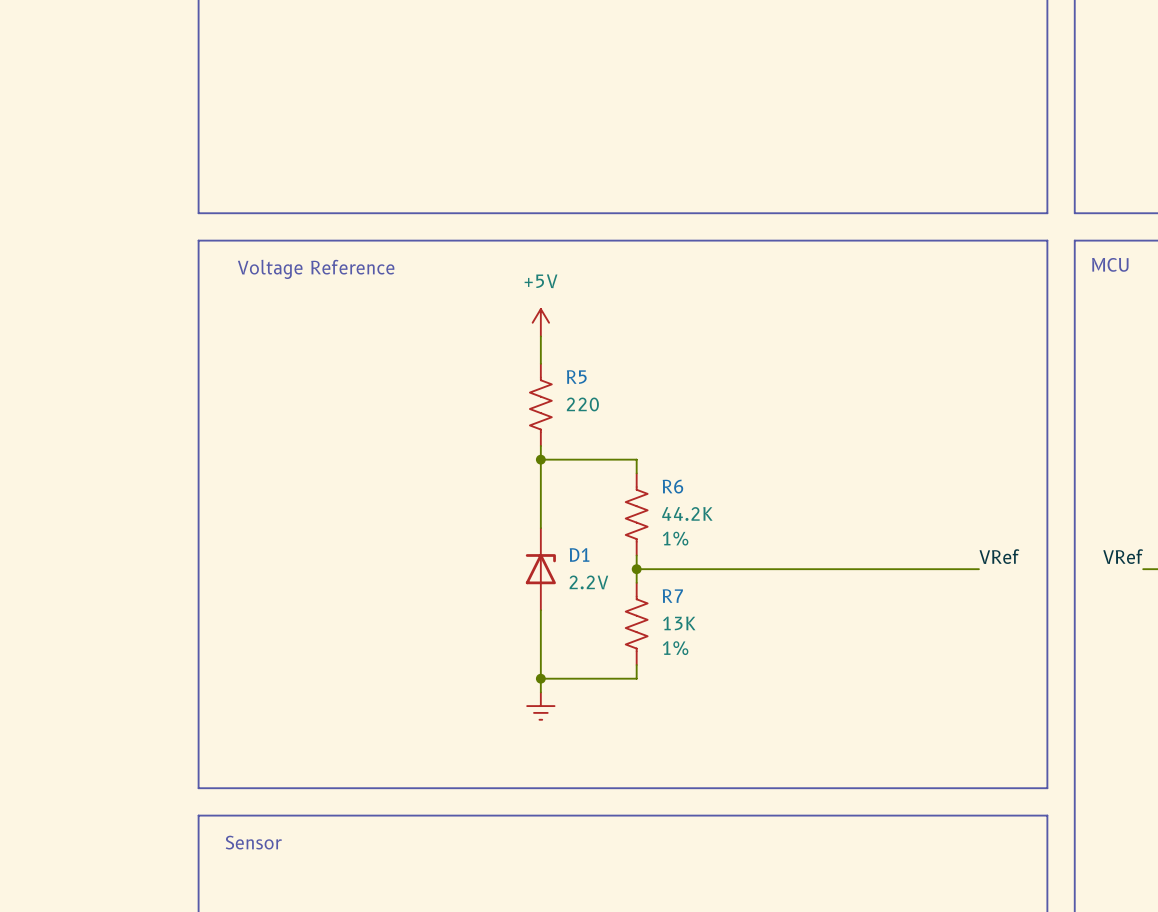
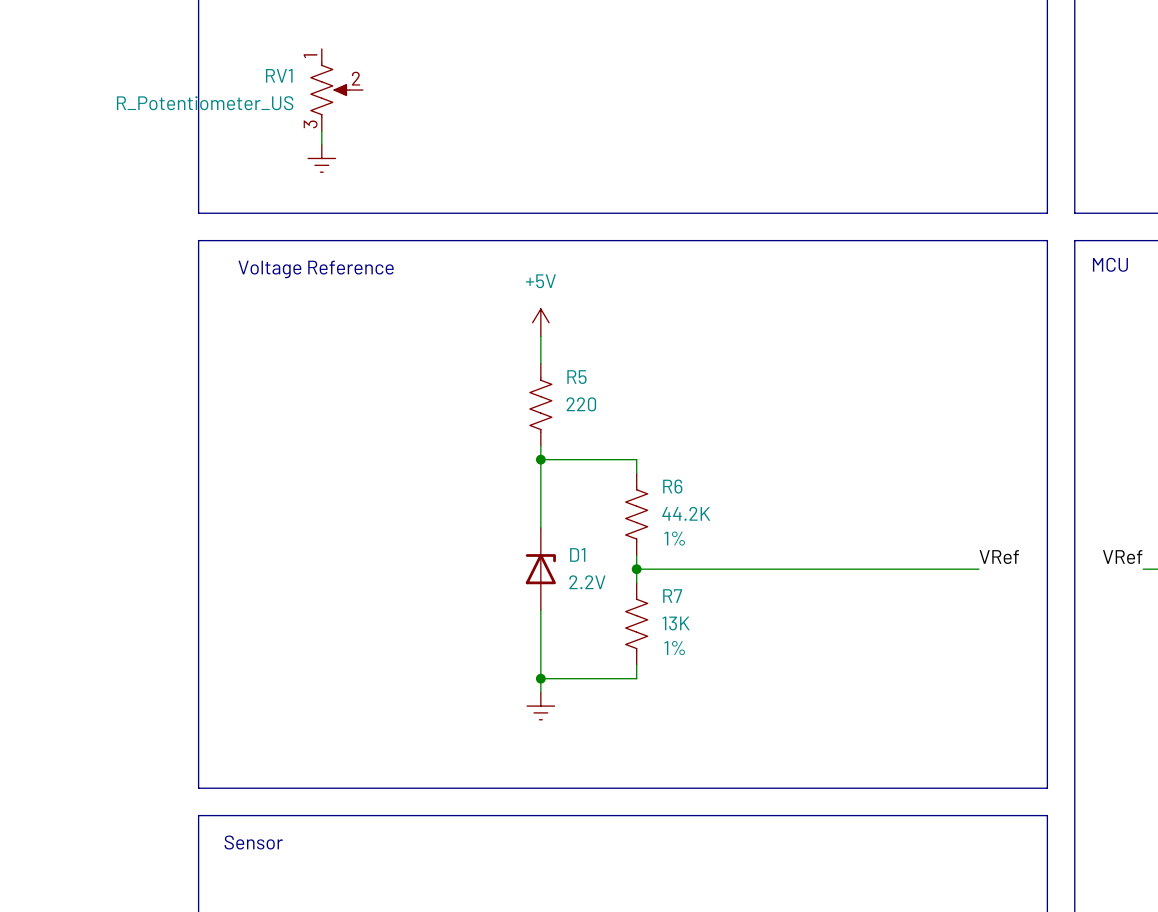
RV1: none -> R_Potentiometer_US (336, 90)
wire: none -> (321, 131) (321, 144)
power symbol: none -> (321, 158)

